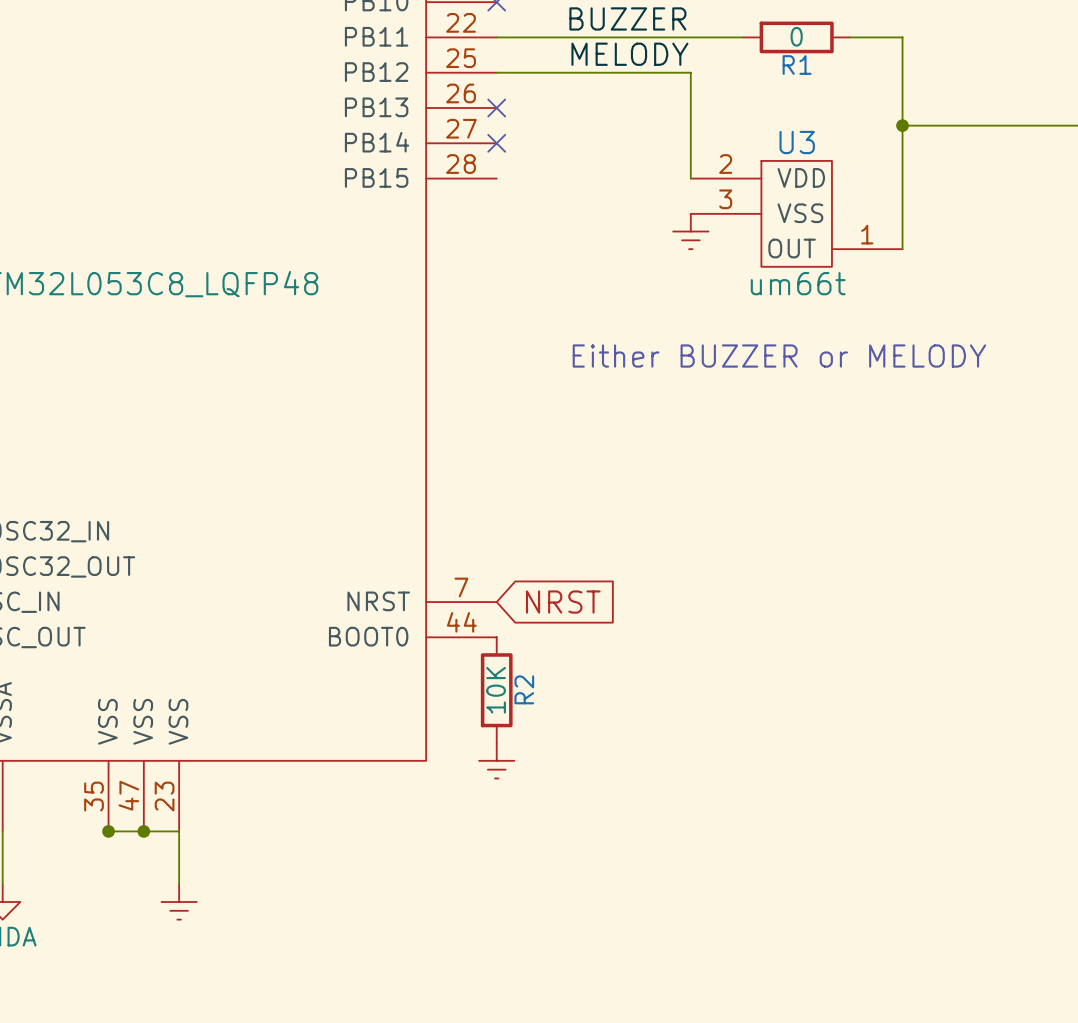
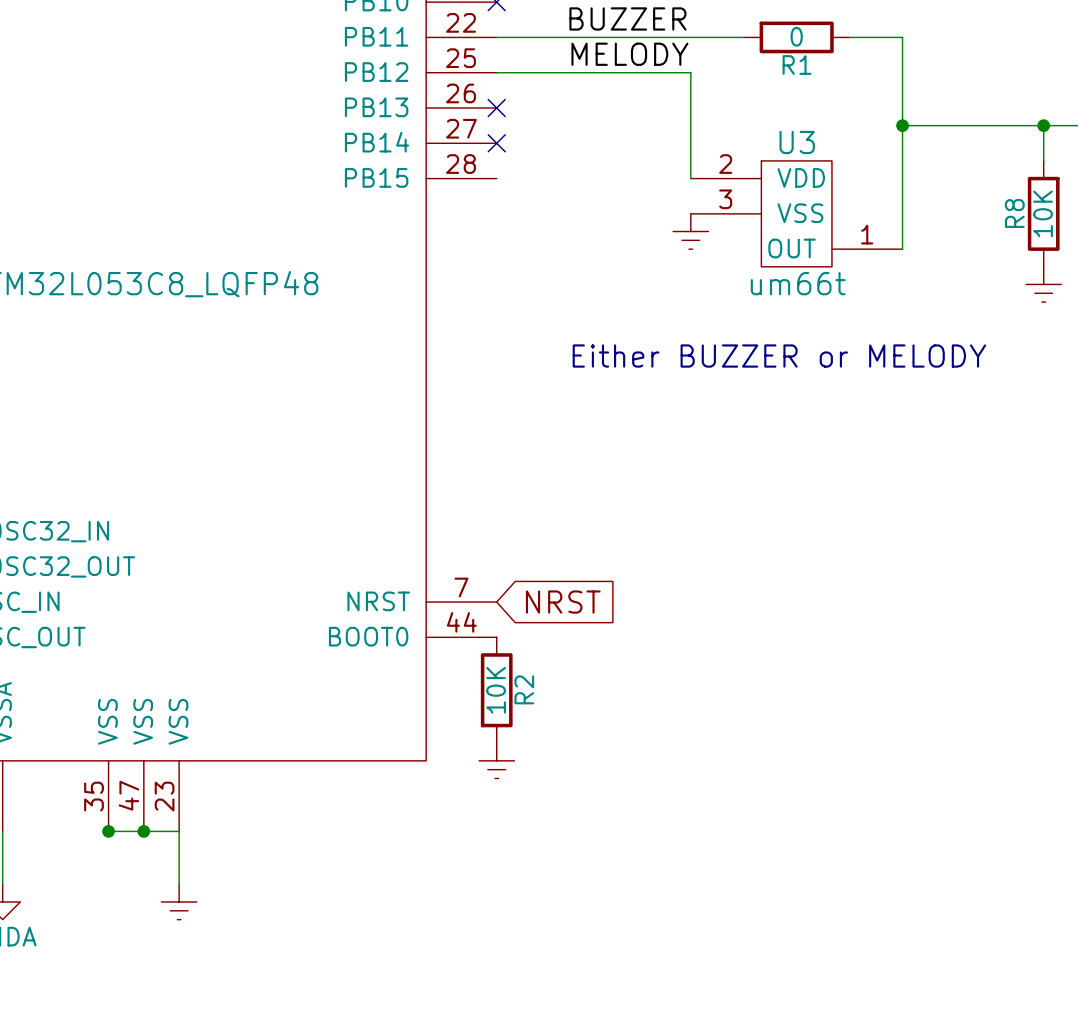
wire: none -> (1043, 125) (1043, 160)
junction: none -> (1043, 125)
R8: none -> 10K (1043, 213)
power symbol: none -> (1043, 284)

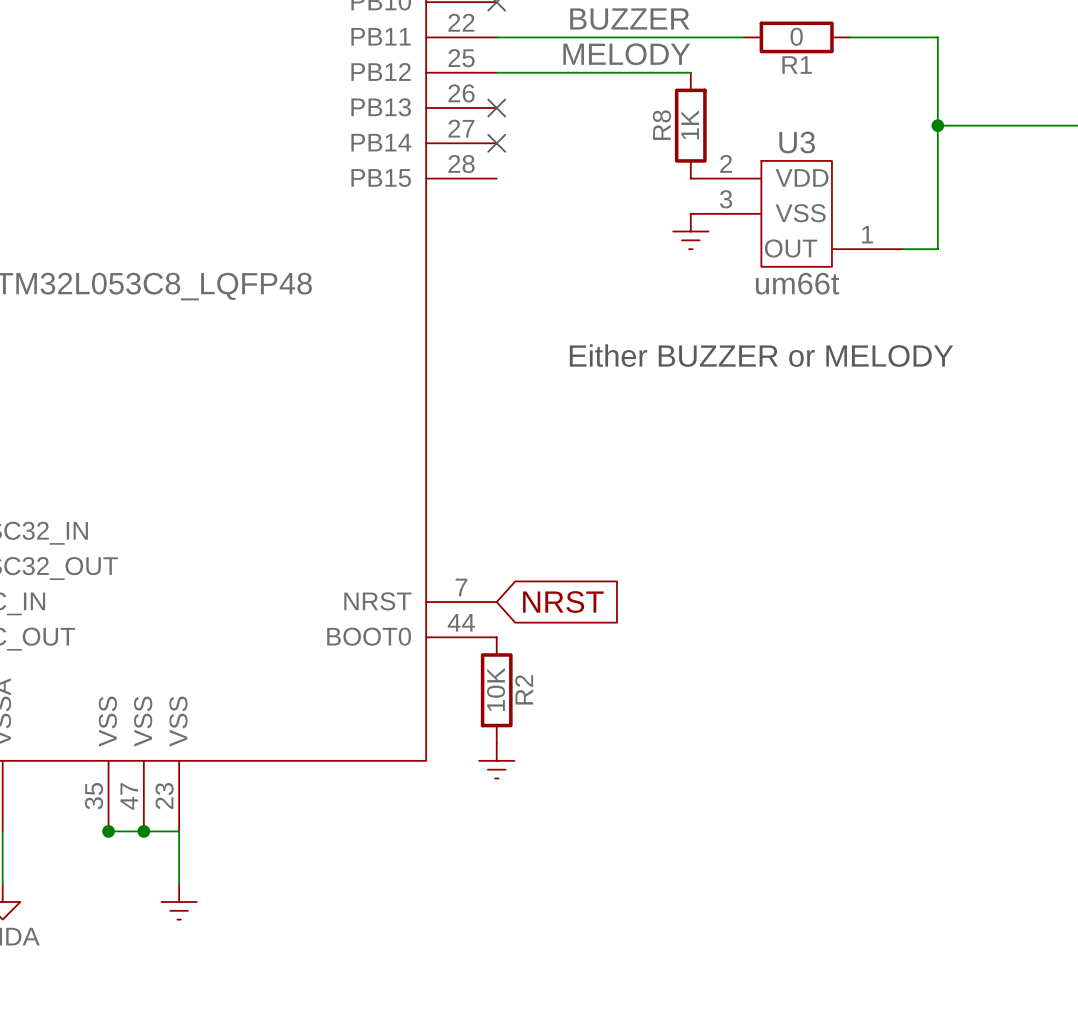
wire: (902, 37) (902, 249) -> (902, 37) (937, 37) (937, 249) (902, 249)
wire: (690, 72) (690, 178) -> none
wire: (902, 125) (937, 125) -> none
junction position: (902, 125) -> (937, 125)
wire: (1043, 125) (1043, 160) -> none
junction: (1043, 125) -> none
R8 position: (1043, 213) -> (690, 125)
R8 value: 10K (1043, 213) -> 1K (690, 124)
power symbol: (1043, 284) -> none

